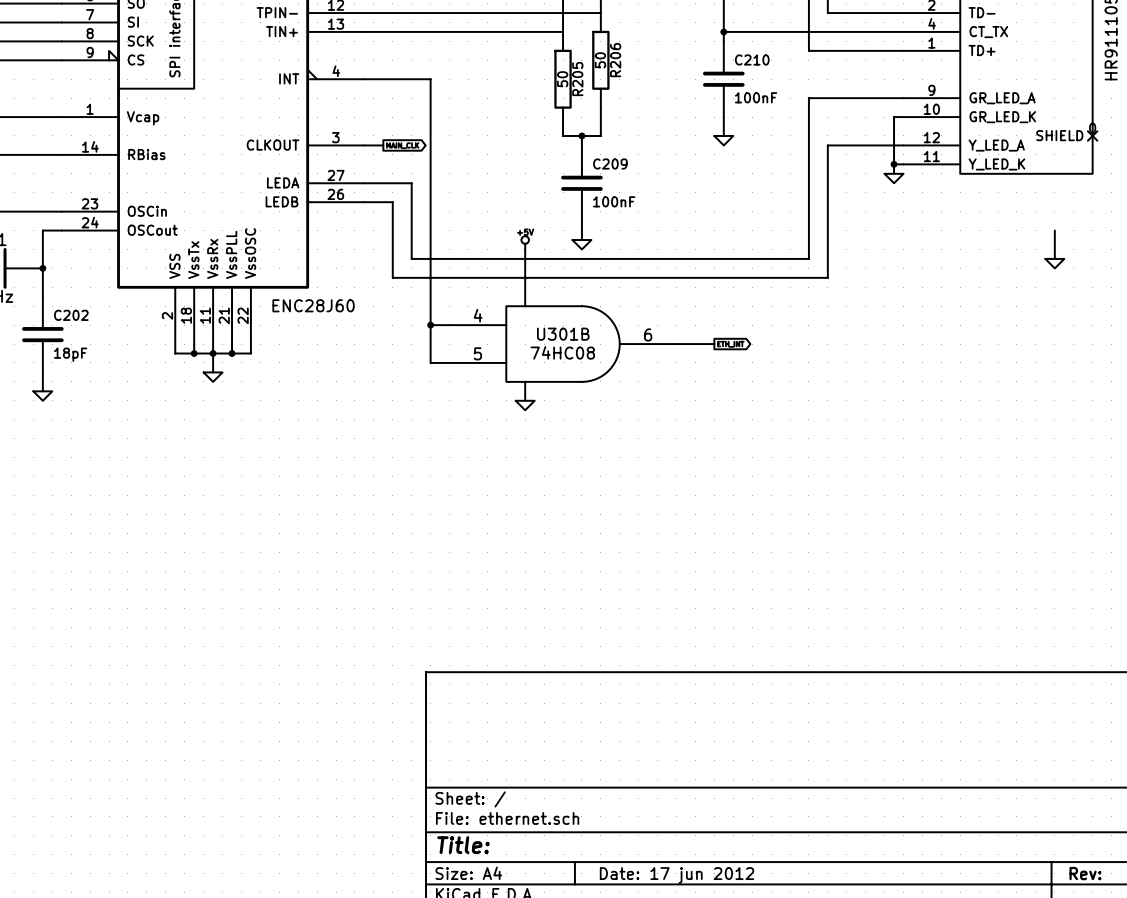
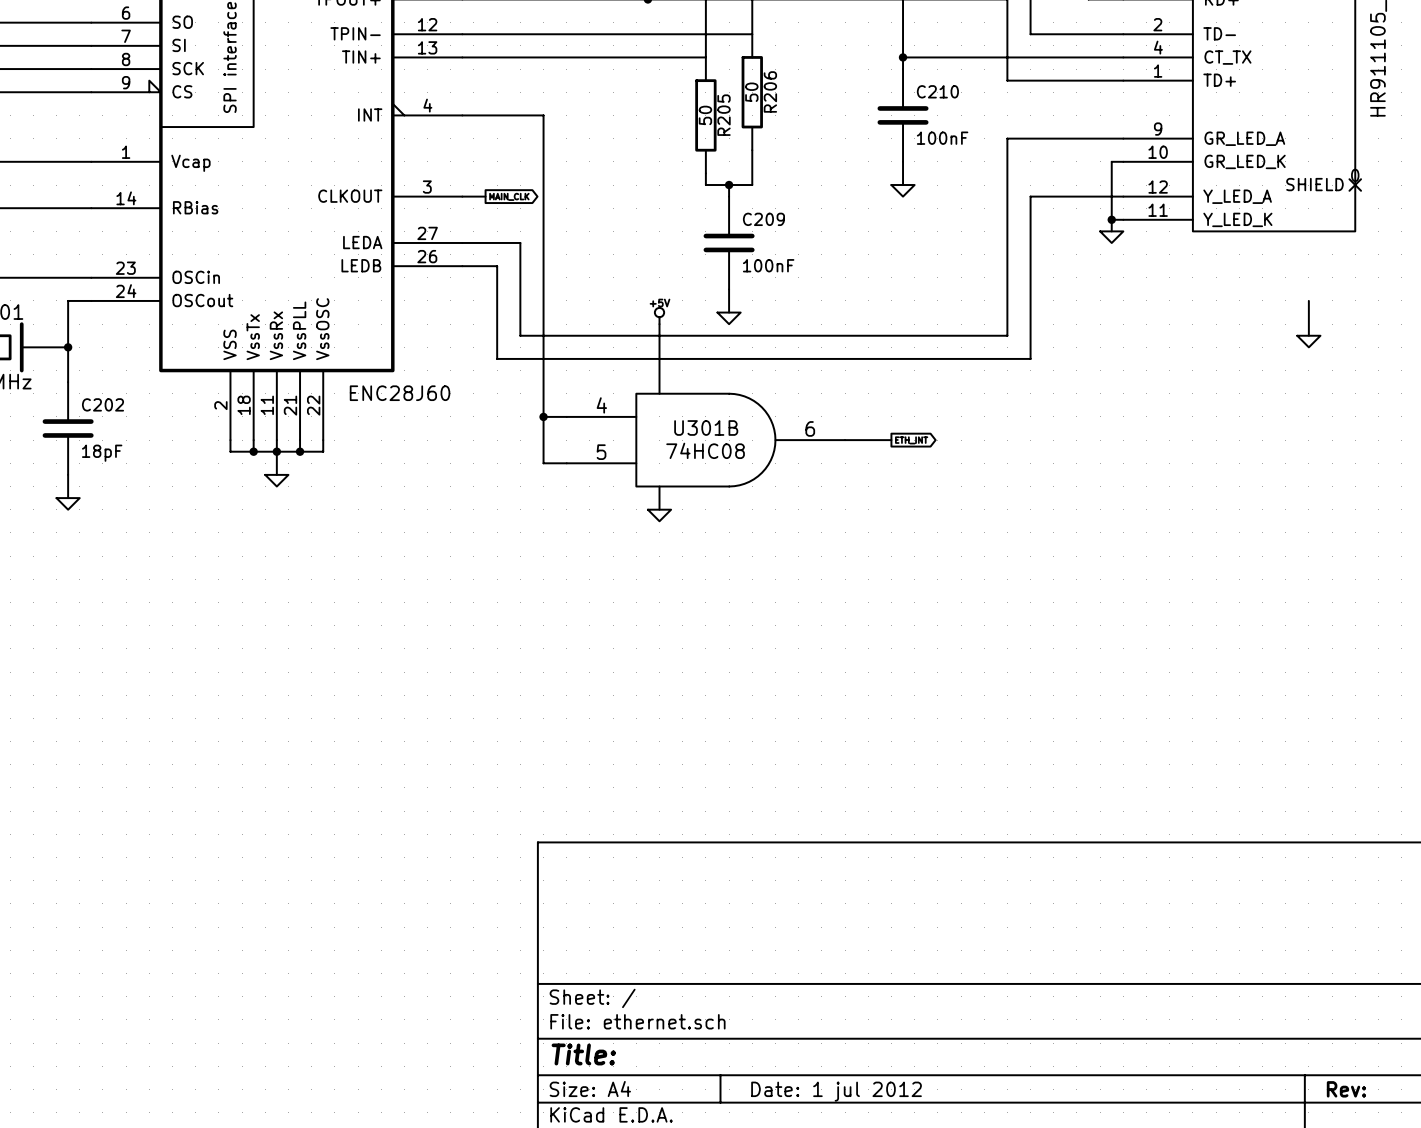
title block: Date: 17 jun 2012 (677, 875) -> Date: 1 jul 2012 (836, 1091)

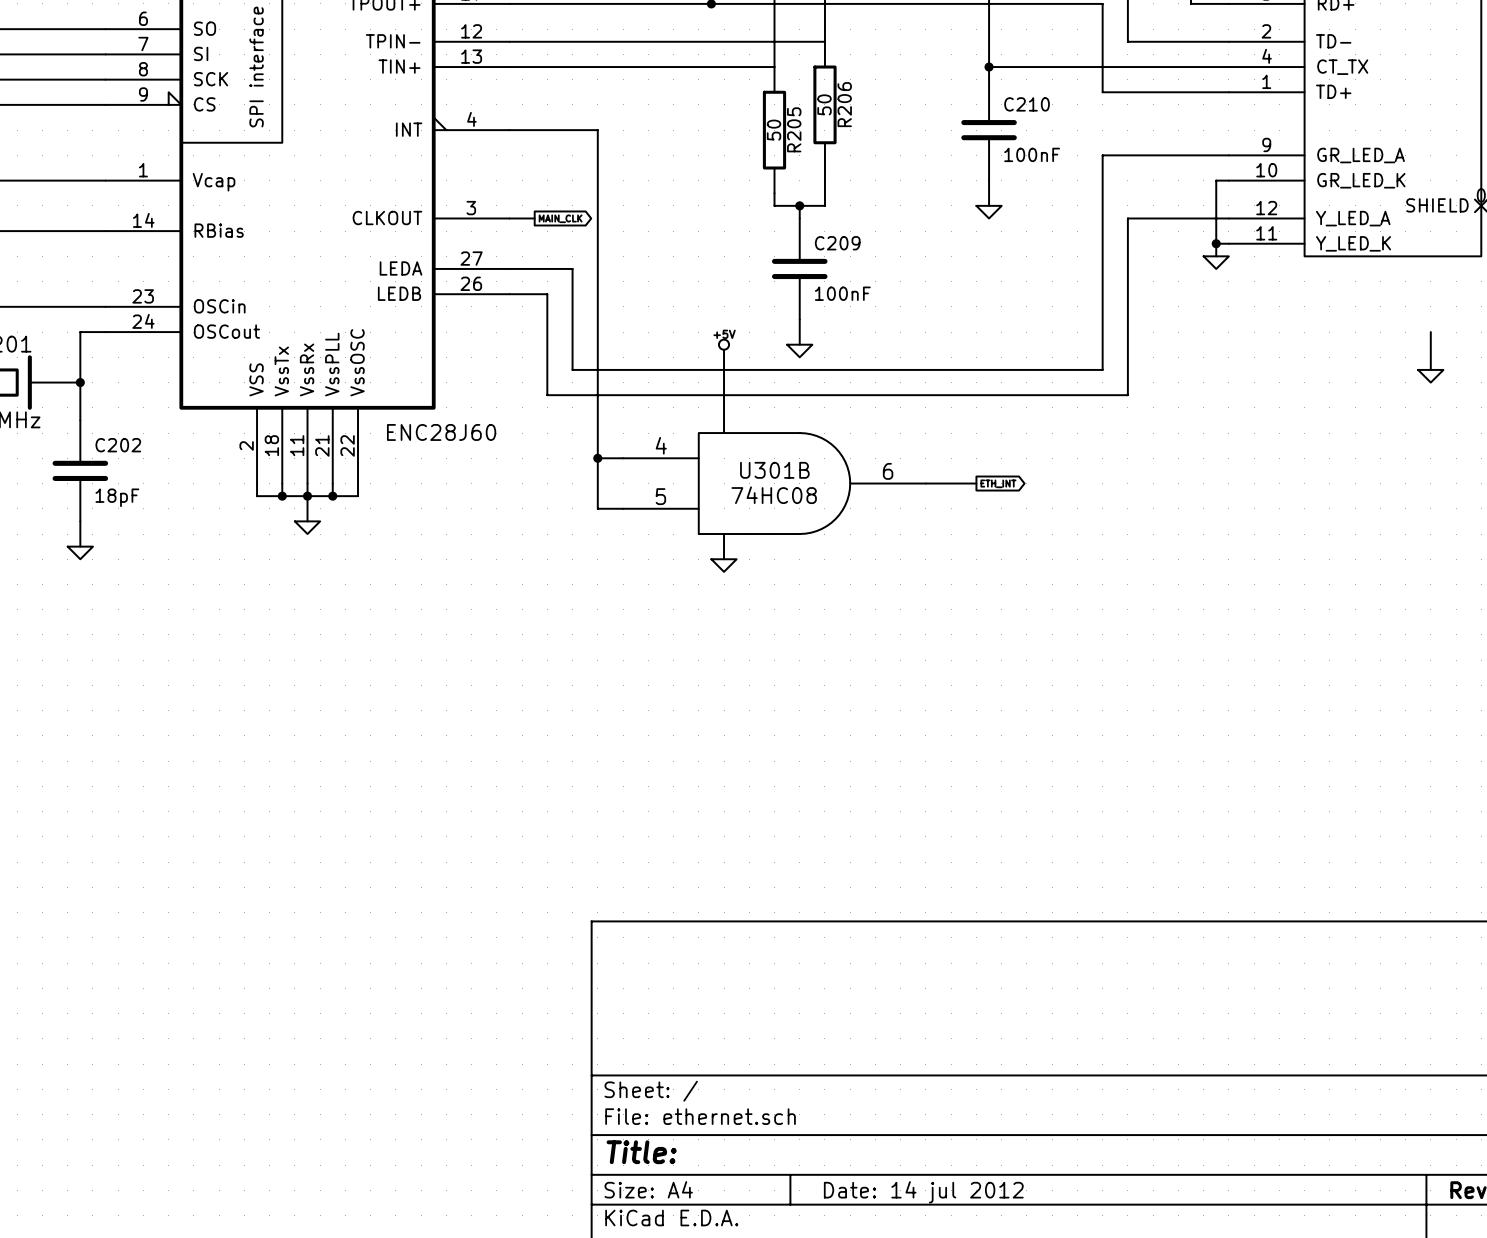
title block: Date: 1 jul 2012 (836, 1091) -> Date: 14 jul 2012 (923, 1192)

